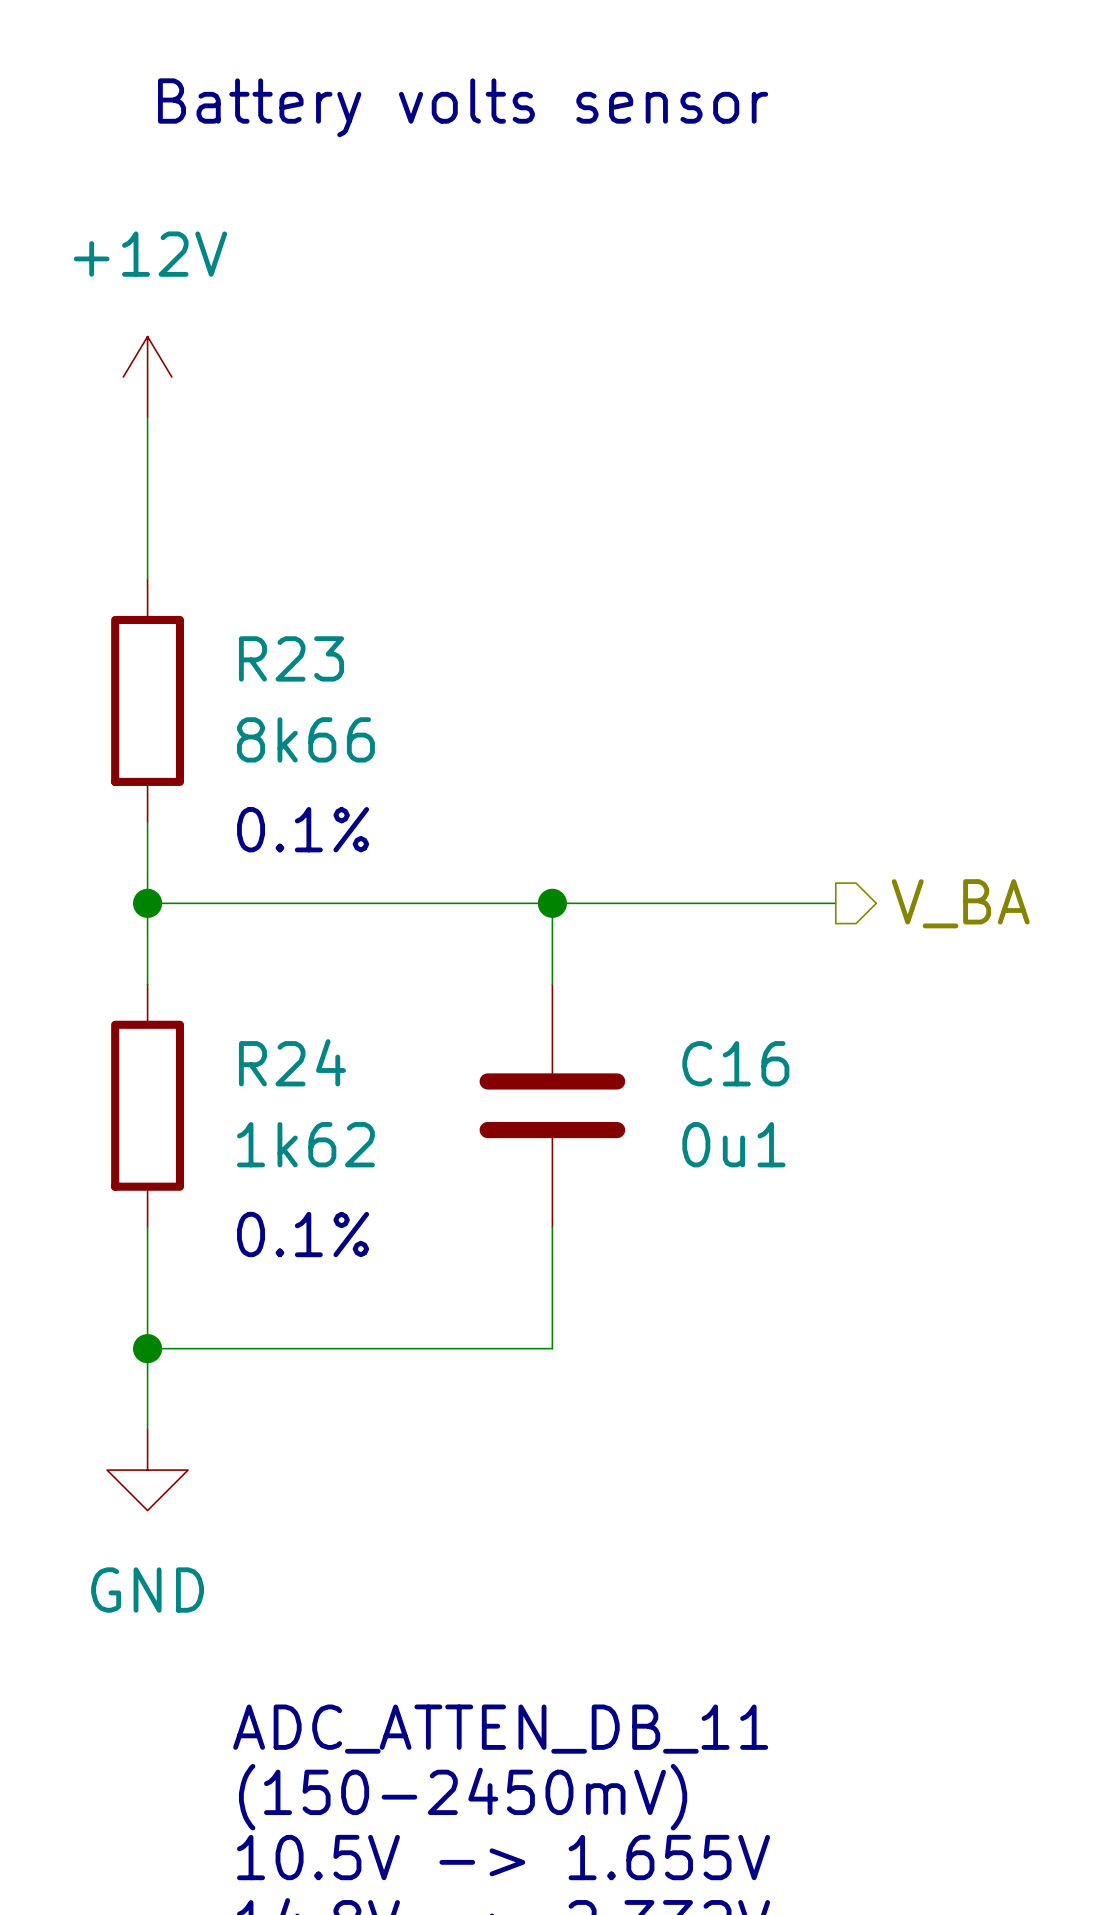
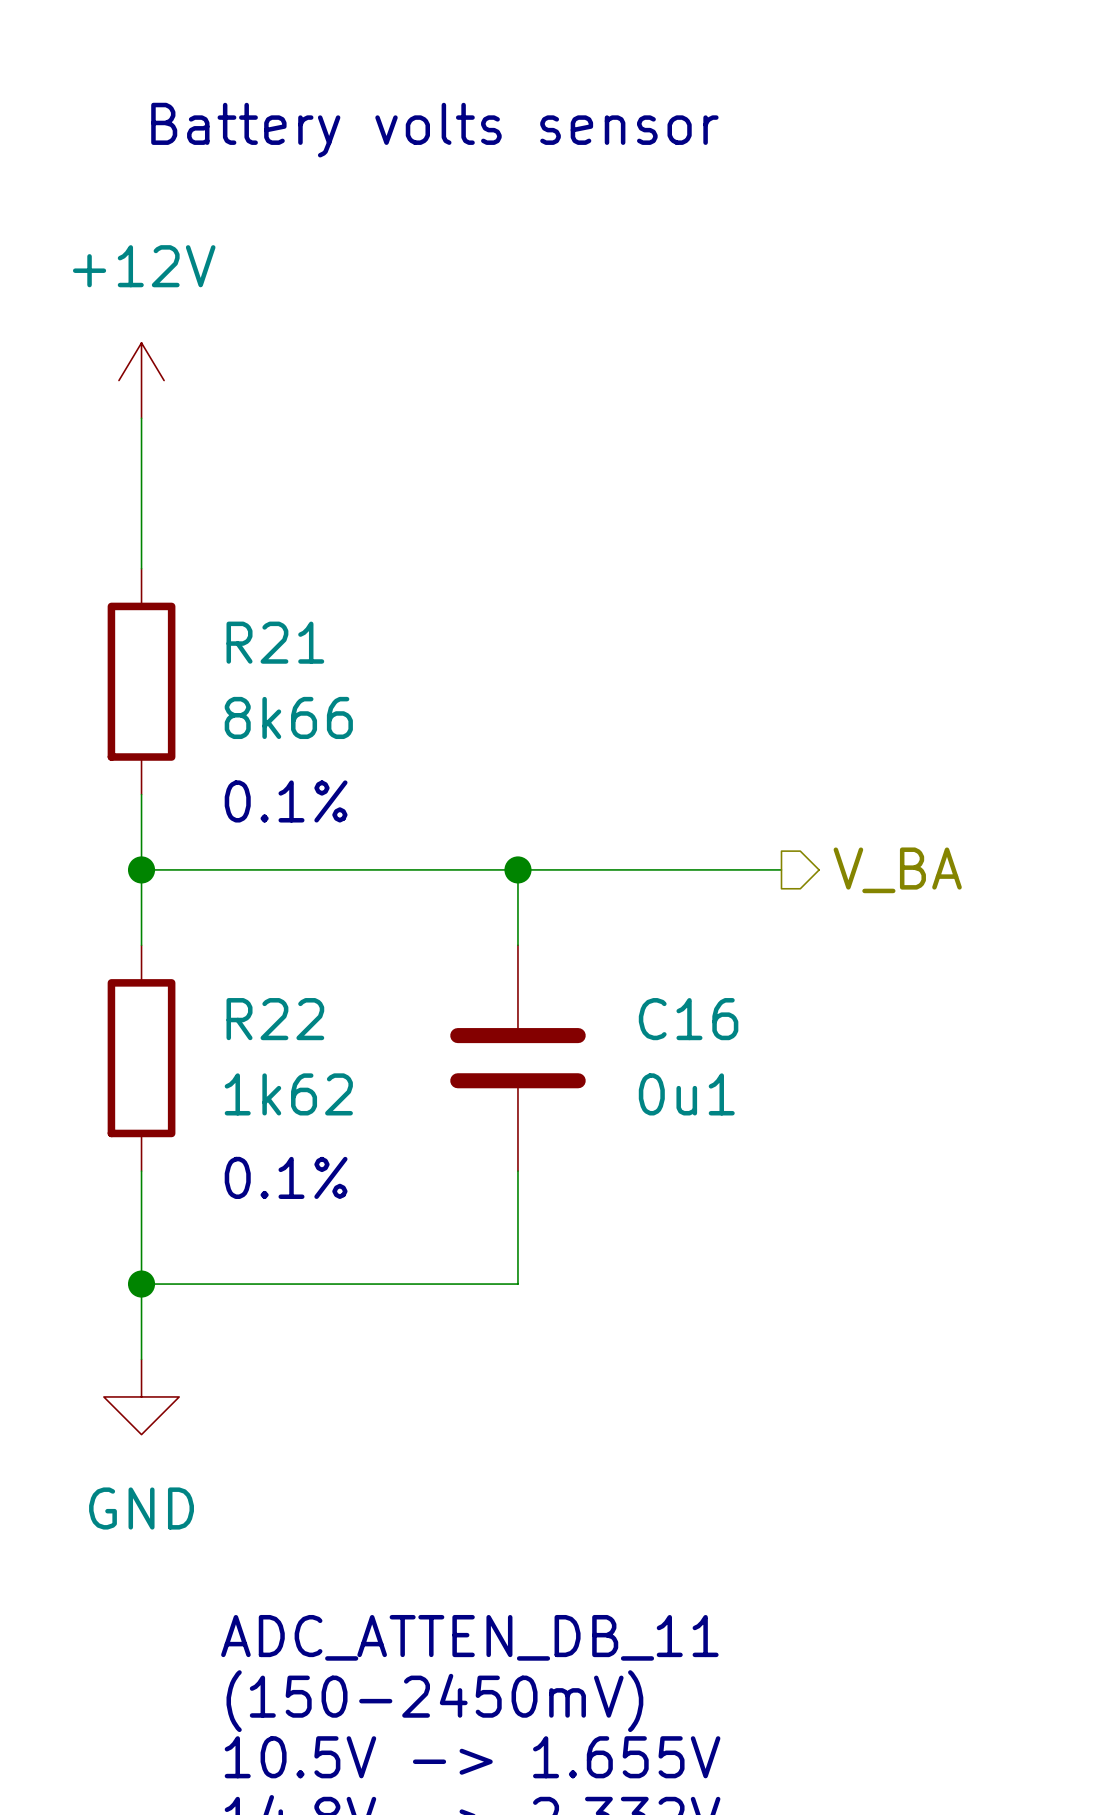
R23 name: R23 (291, 658) -> R21 (275, 642)
R24 name: R24 (292, 1062) -> R22 (275, 1019)

